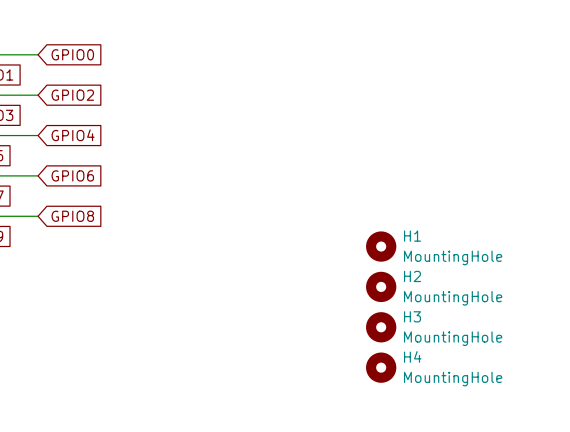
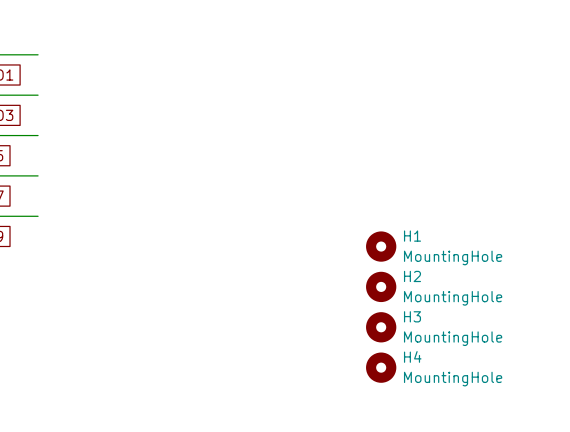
global label: GPIO0 (72, 54) -> none
global label: GPIO2 (72, 95) -> none
global label: GPIO4 (73, 135) -> none
global label: GPIO6 (72, 175) -> none
global label: GPIO8 (72, 216) -> none

